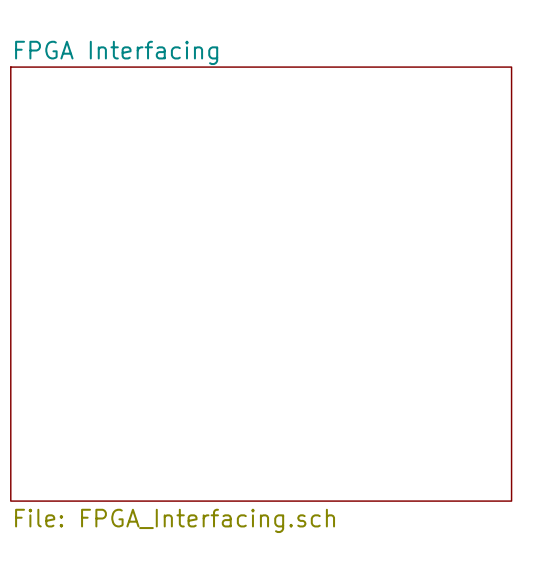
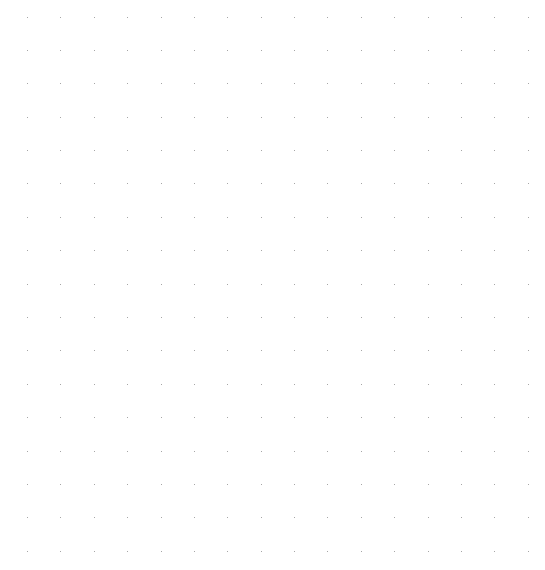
sheet FPGA Interfacing: File: FPGA_Interfacing.sch (261, 284) -> none

